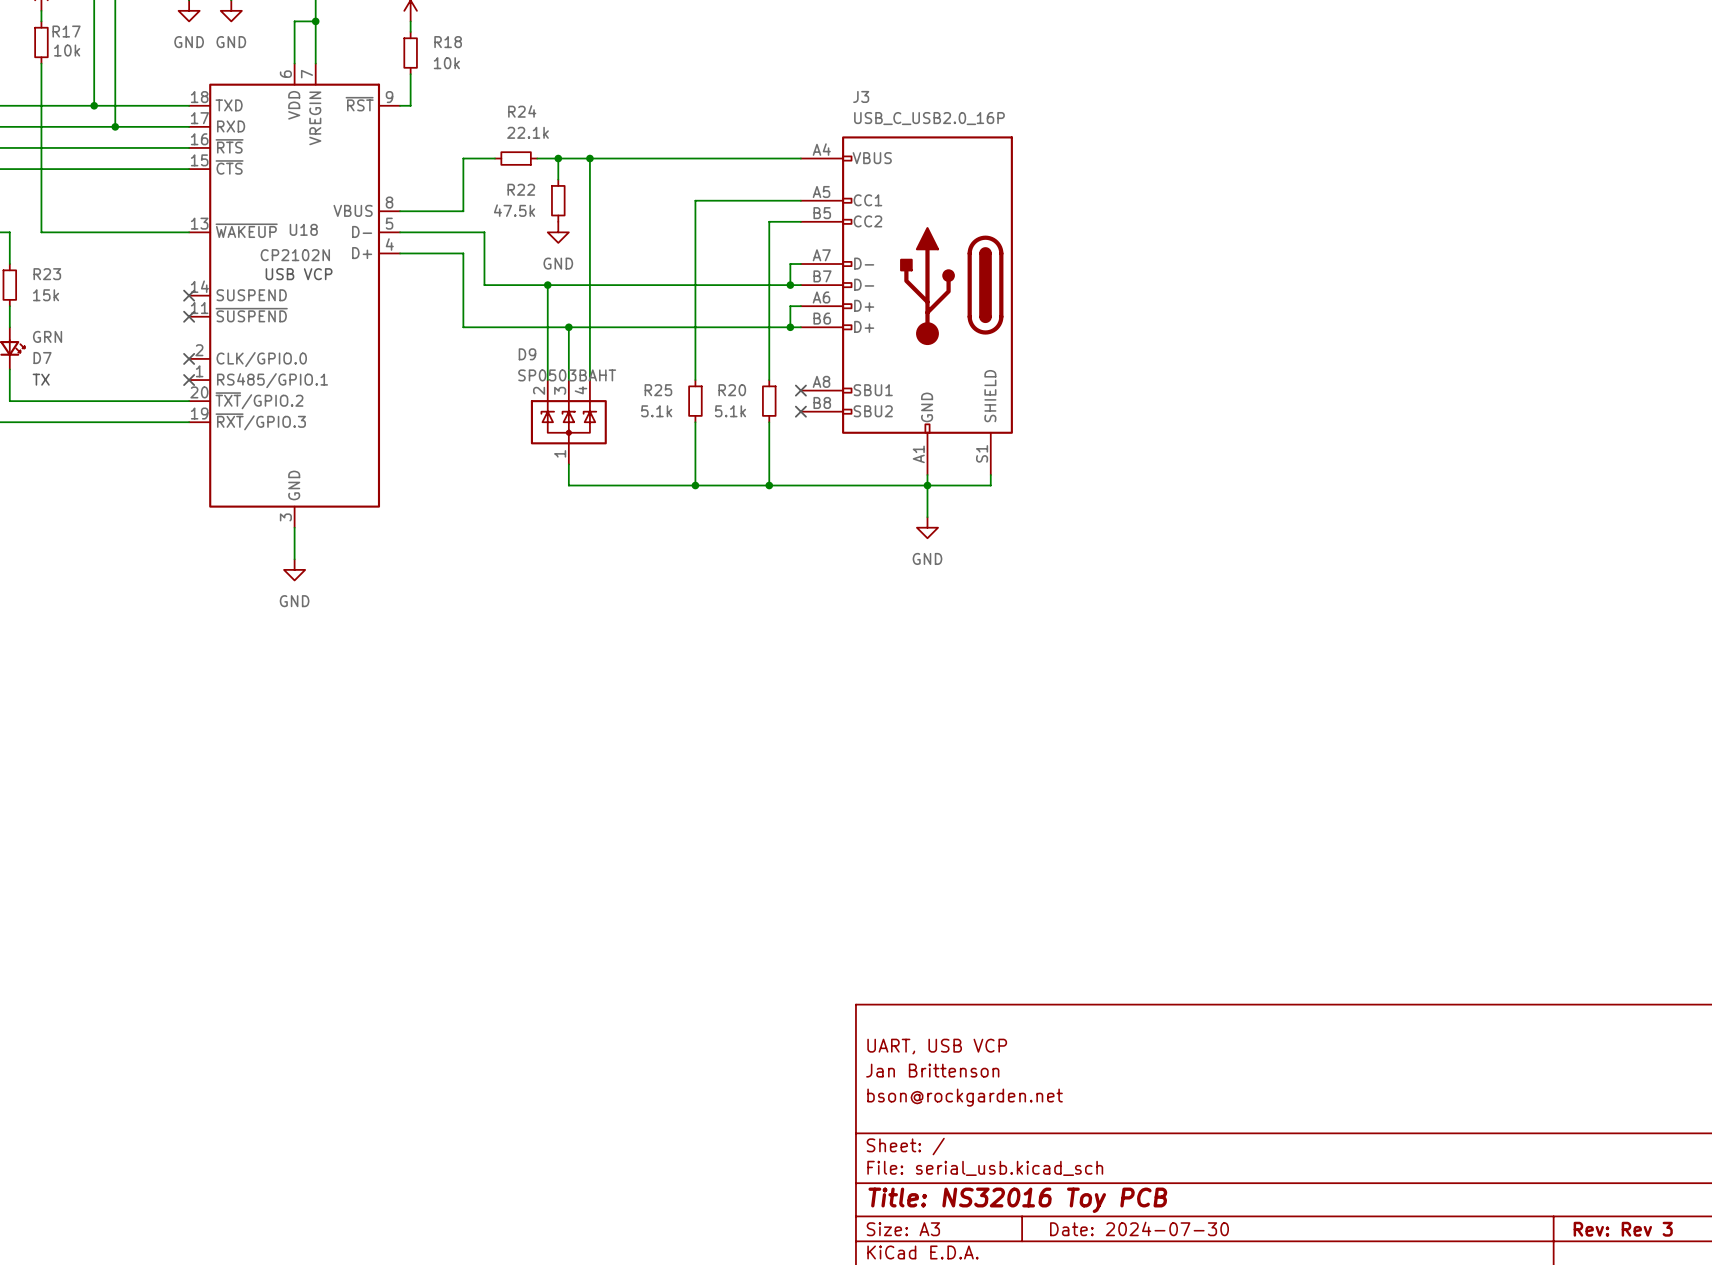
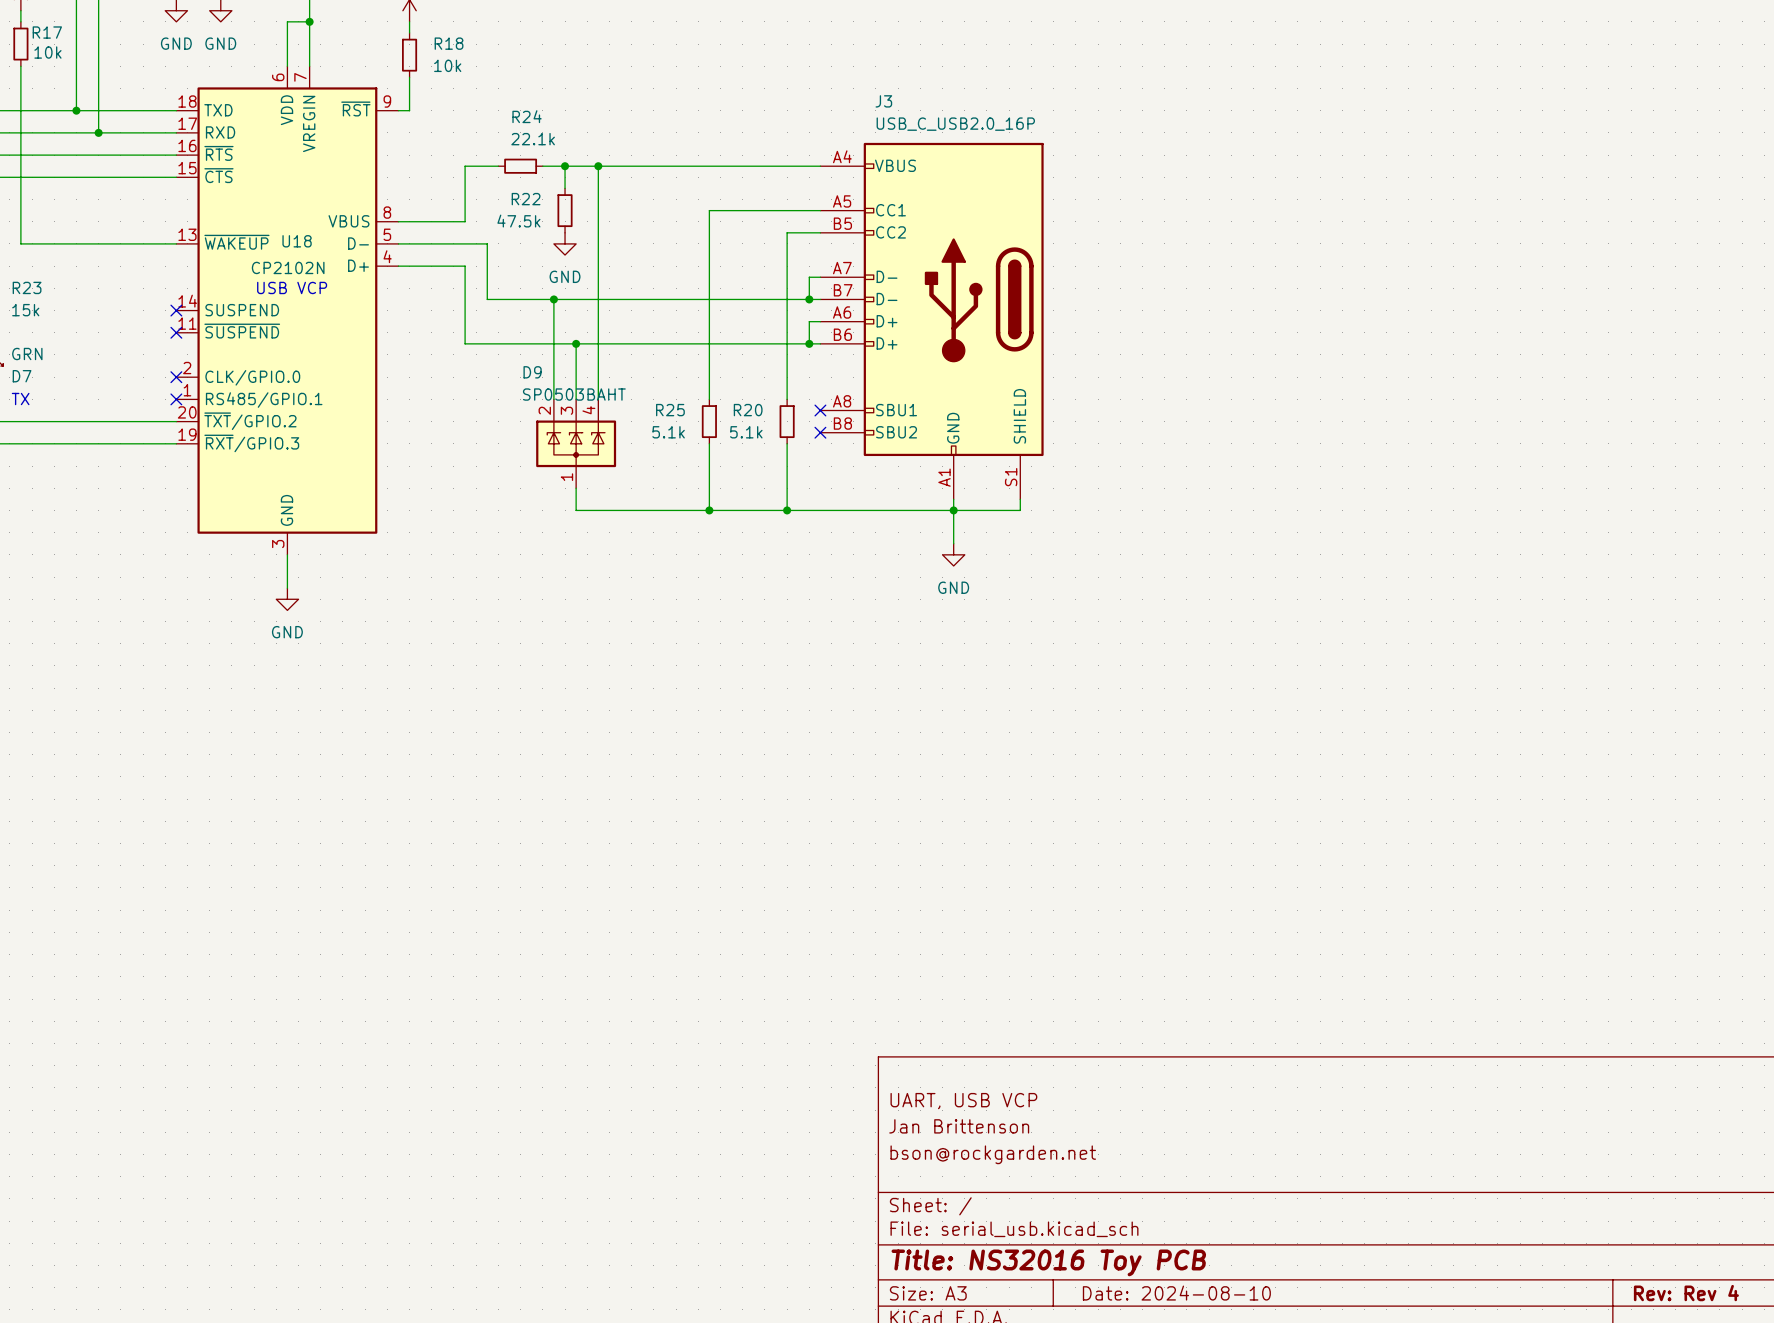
title block: Date: 2024-07-30 (1139, 1228) -> Date: 2024-08-10 (1176, 1293)
title block: Rev: Rev 3 (1623, 1229) -> Rev: Rev 4 (1686, 1293)

